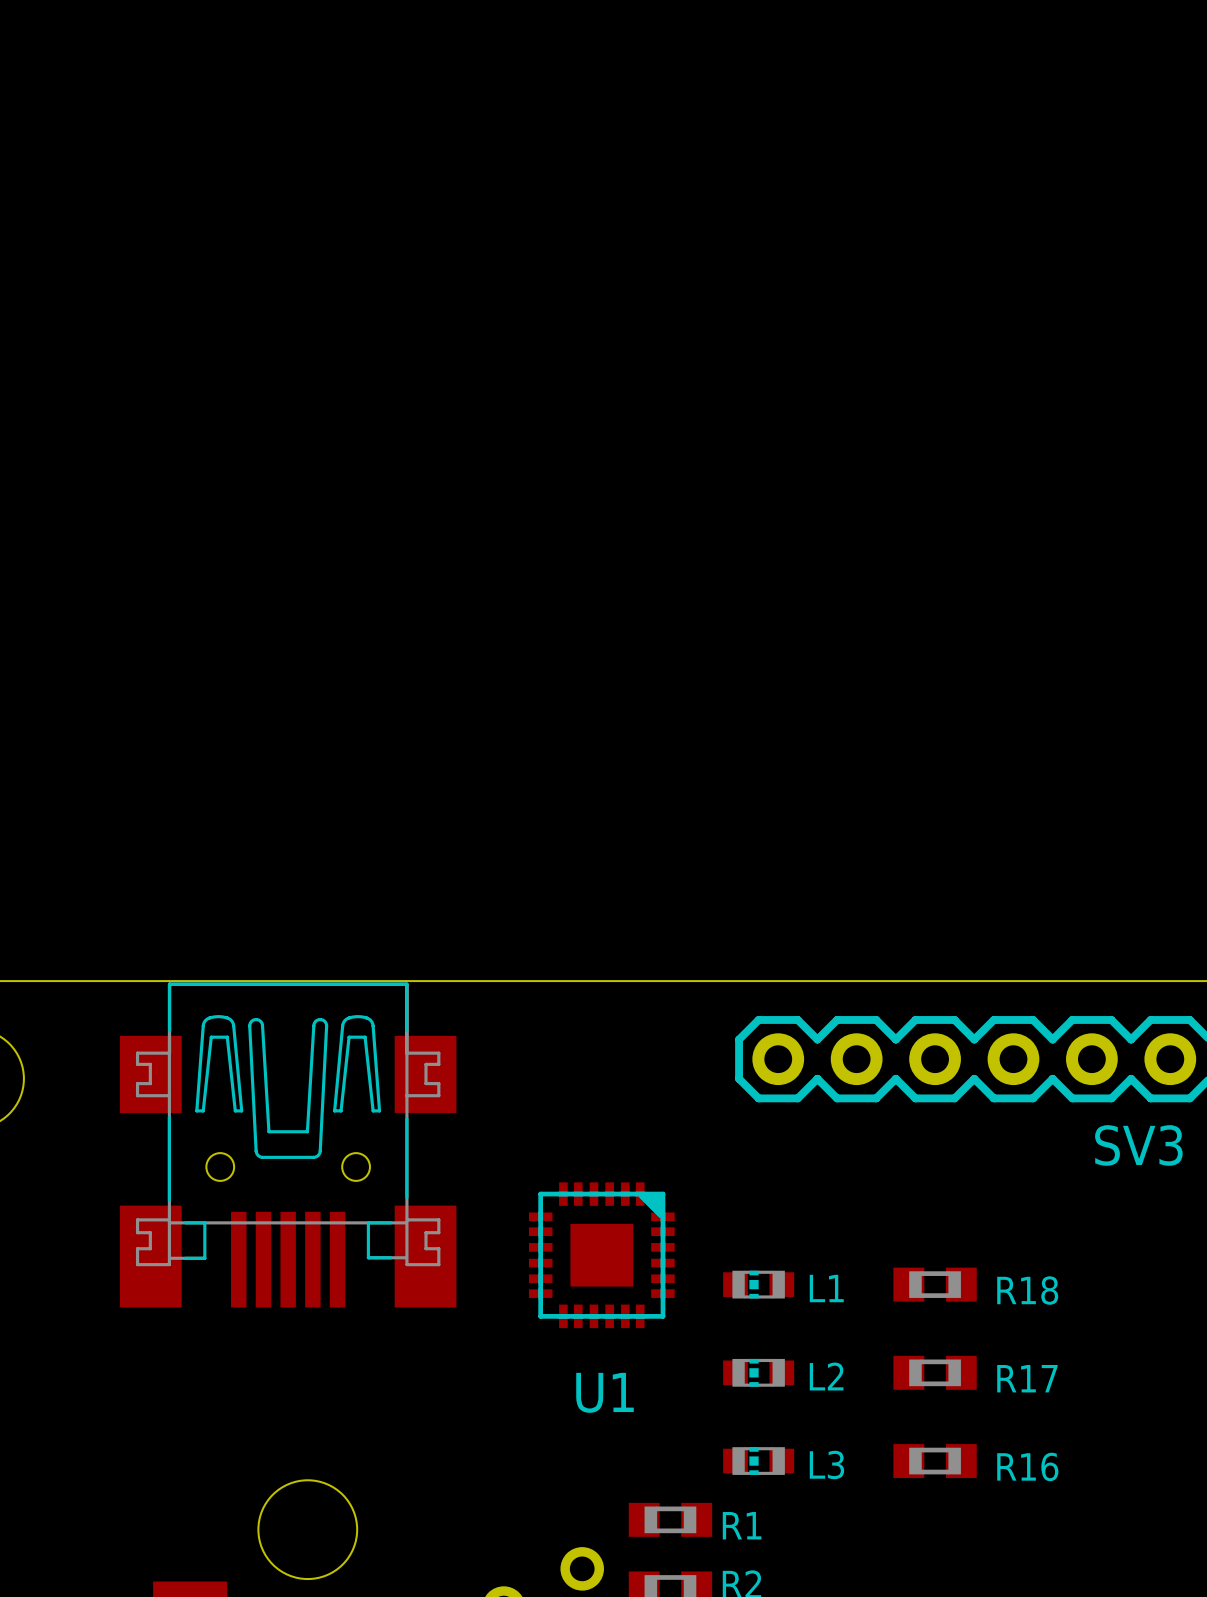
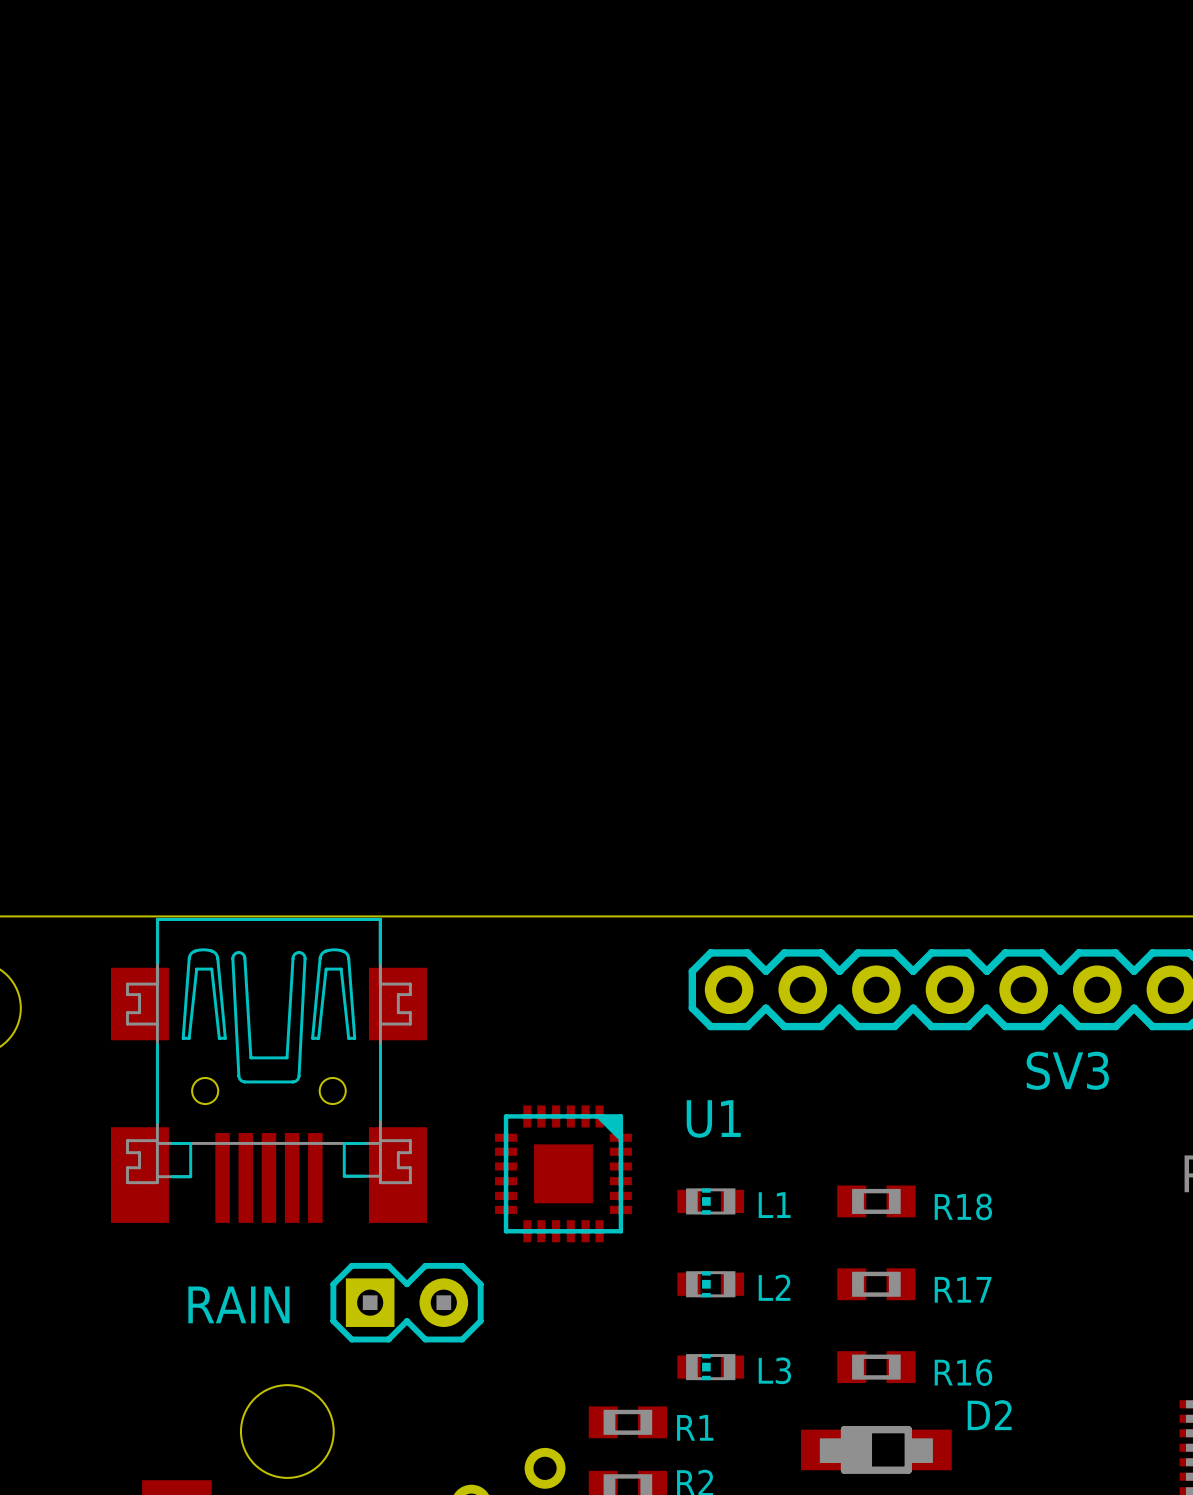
RAIN: none -> (407, 1302)
U1 name position: U1 (605, 1392) -> U1 (713, 1118)
D2: none -> (876, 1449)

